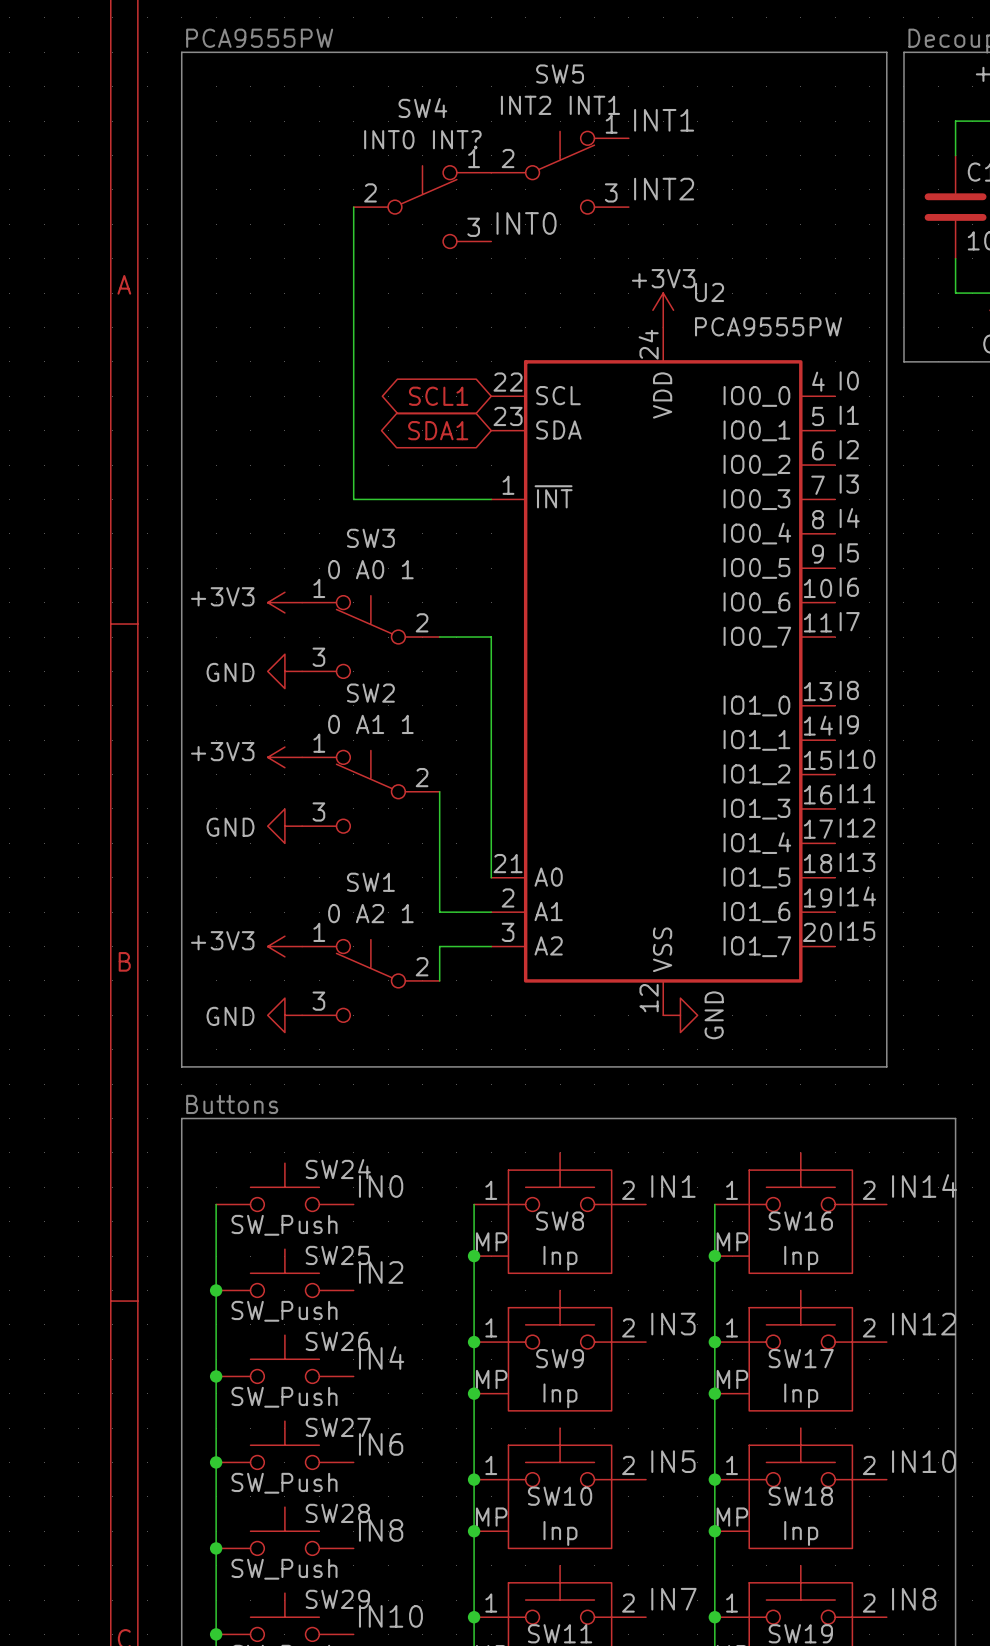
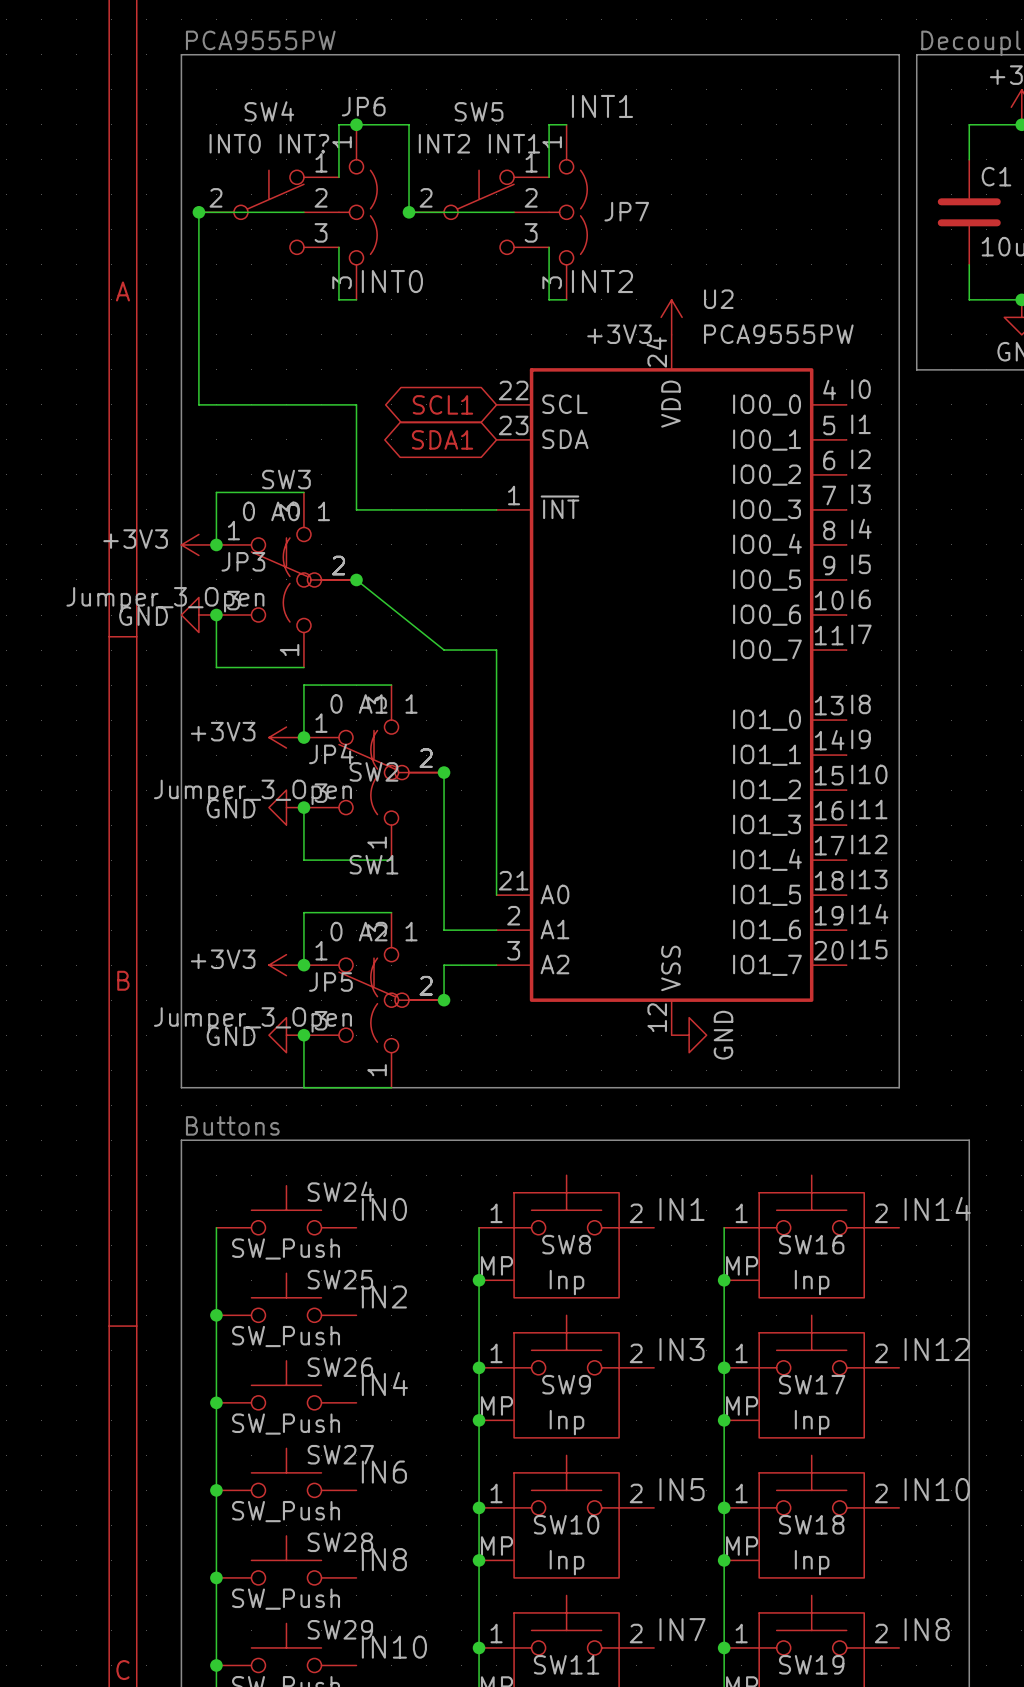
label position: INT1 (664, 120) -> INT1 (602, 106)
junction: none -> (356, 124)
wire: none -> (566, 124) (549, 124) (549, 177)
wire: none -> (338, 177) (338, 124) (409, 124) (409, 212) (514, 212)
SW5 position: (560, 172) -> (479, 212)
label position: INT2 (664, 189) -> INT2 (602, 281)
junction: none -> (198, 212)
JP6: none -> (340, 212)
wire: (353, 207) (353, 396) -> (303, 212) (198, 212) (198, 404) (356, 404)
junction: none -> (409, 212)
SW4 position: (422, 207) -> (268, 212)
JP7: none -> (550, 212)
label position: INT0 (526, 223) -> INT0 (392, 281)
wire: none -> (338, 247) (338, 299) (356, 299)
wire: none -> (549, 247) (549, 299) (566, 299)
power symbol text position: +3V3 (663, 278) -> +3V3 (619, 334)
wire: none -> (303, 492) (216, 492) (216, 544)
power symbol: none -> +3V3 (198, 544)
junction: none -> (216, 544)
JP3: none -> Jumper_3_Open (319, 579)
wire: none -> (356, 579) (444, 650)
junction: none -> (356, 579)
power symbol: none -> GND (198, 615)
wire: none -> (216, 615) (216, 667) (303, 667)
junction: none -> (216, 615)
power symbol: +3V3 (284, 602) -> none
SW3 position: (370, 637) -> (286, 579)
power symbol: GND (284, 671) -> none
wire: none -> (391, 685) (303, 685) (303, 737)
SW2 name position: SW2 (370, 693) -> SW2 (374, 771)
junction: none -> (303, 737)
power symbol position: +3V3 (284, 757) -> +3V3 (286, 737)
JP4: none -> Jumper_3_Open (407, 772)
wire: none -> (444, 772) (444, 807)
junction: none -> (444, 772)
wire: none -> (303, 807) (303, 860) (391, 860)
junction: none -> (303, 807)
SW2 position: (370, 791) -> (374, 772)
power symbol position: GND (284, 826) -> GND (286, 807)
SW1 name position: SW1 (370, 882) -> SW1 (374, 864)
wire: none -> (391, 912) (303, 912) (303, 965)
junction: none -> (303, 965)
JP5: none -> Jumper_3_Open (407, 1000)
junction: none -> (444, 1000)
wire: none -> (303, 1035) (303, 1087) (391, 1087)
junction: none -> (303, 1035)

